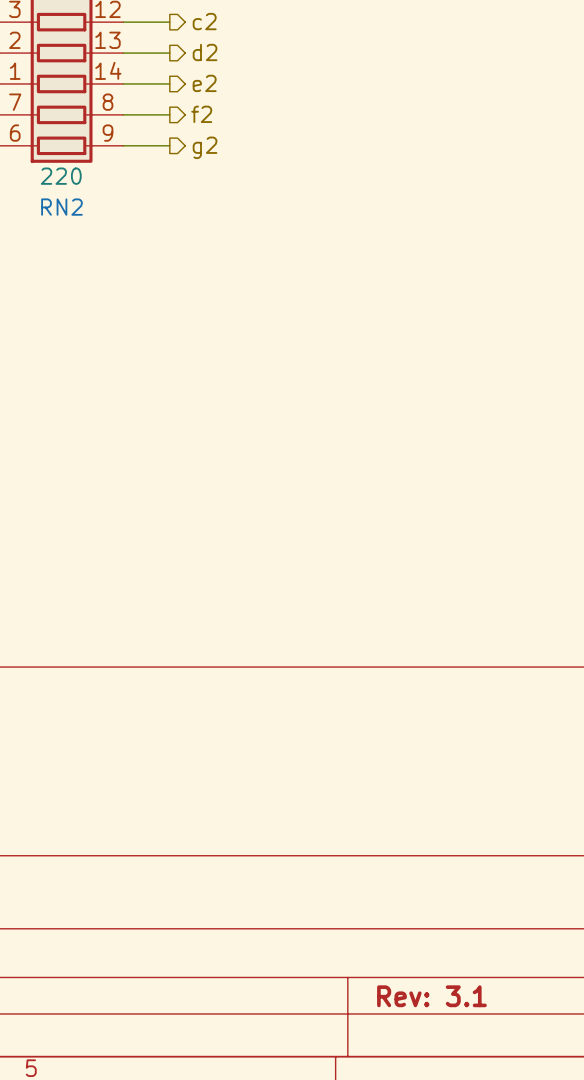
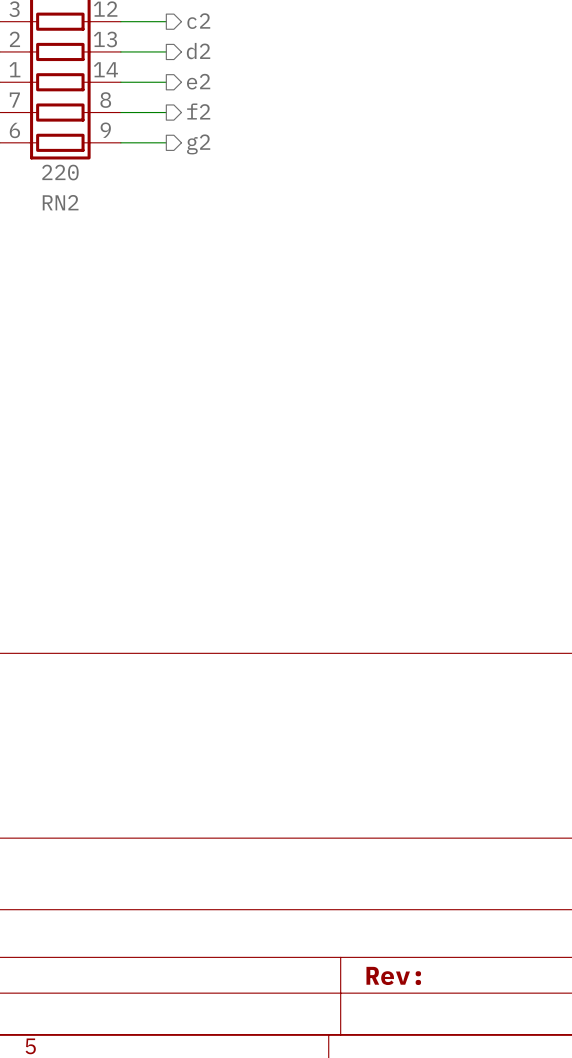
title block: Rev: 3.1 (431, 996) -> Rev: (393, 975)

